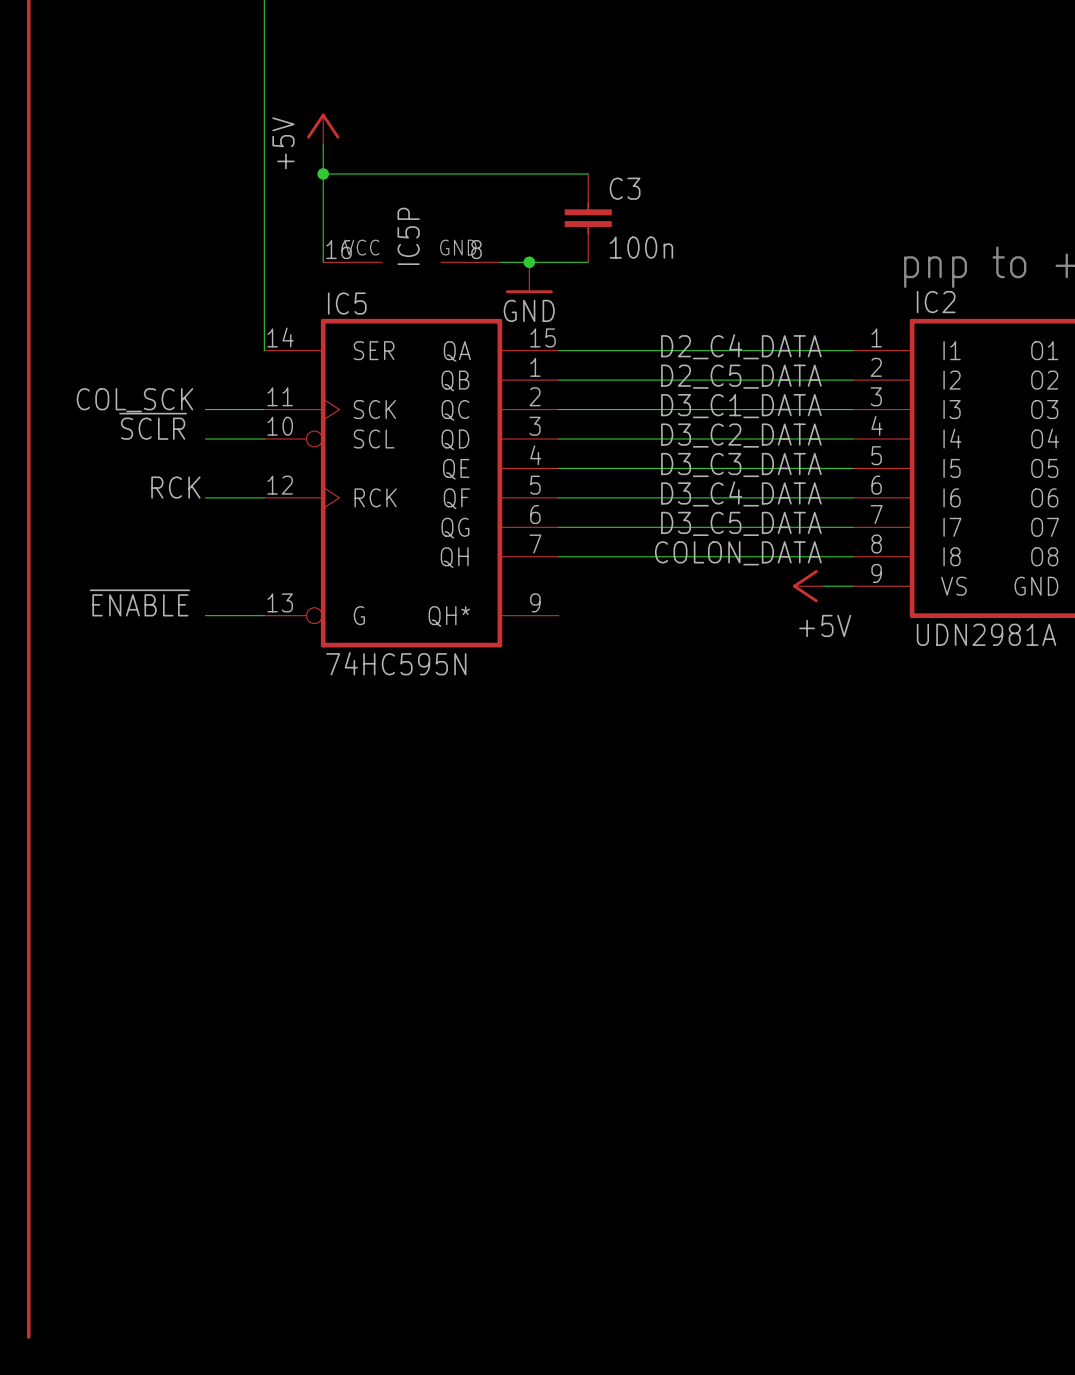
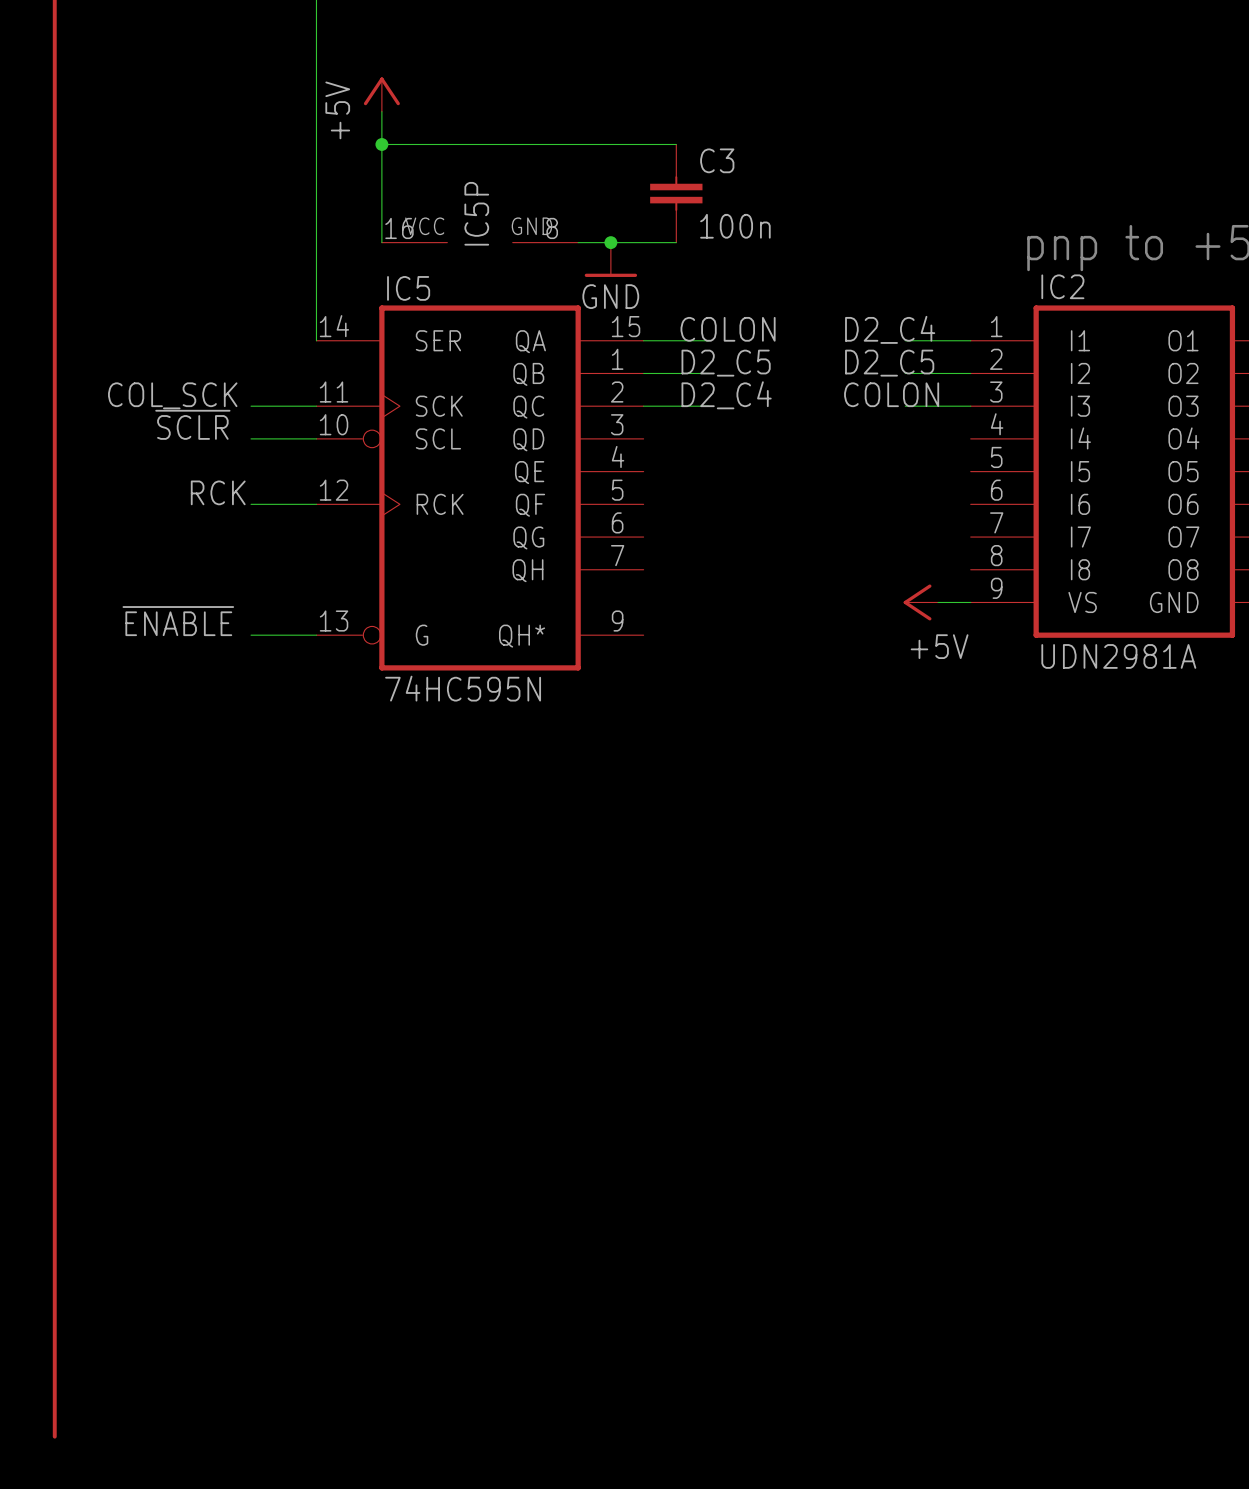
label: none -> COLON (728, 329)
label: D2_C4_DATA (741, 346) -> D2_C4 (890, 329)
wire: (617, 350) (794, 350) -> none
label: none -> D2_C5 (726, 363)
label: D2_C5_DATA (741, 376) -> D2_C5 (889, 363)
wire: (617, 380) (794, 380) -> none
label: none -> D2_C4 (726, 395)
label: none -> COLON (891, 394)
label: D3_C1_DATA (741, 406) -> none
wire: (617, 409) (794, 409) -> none
label: D3_C2_DATA (741, 435) -> none
wire: (558, 438) (853, 438) -> none
label: D3_C3_DATA (741, 465) -> none
wire: (558, 468) (853, 468) -> none
label: D3_C4_DATA (741, 493) -> none
wire: (558, 497) (853, 497) -> none
label: D3_C5_DATA (741, 523) -> none
wire: (558, 527) (853, 527) -> none
label: COLON_DATA (738, 553) -> none
wire: (558, 556) (853, 556) -> none

